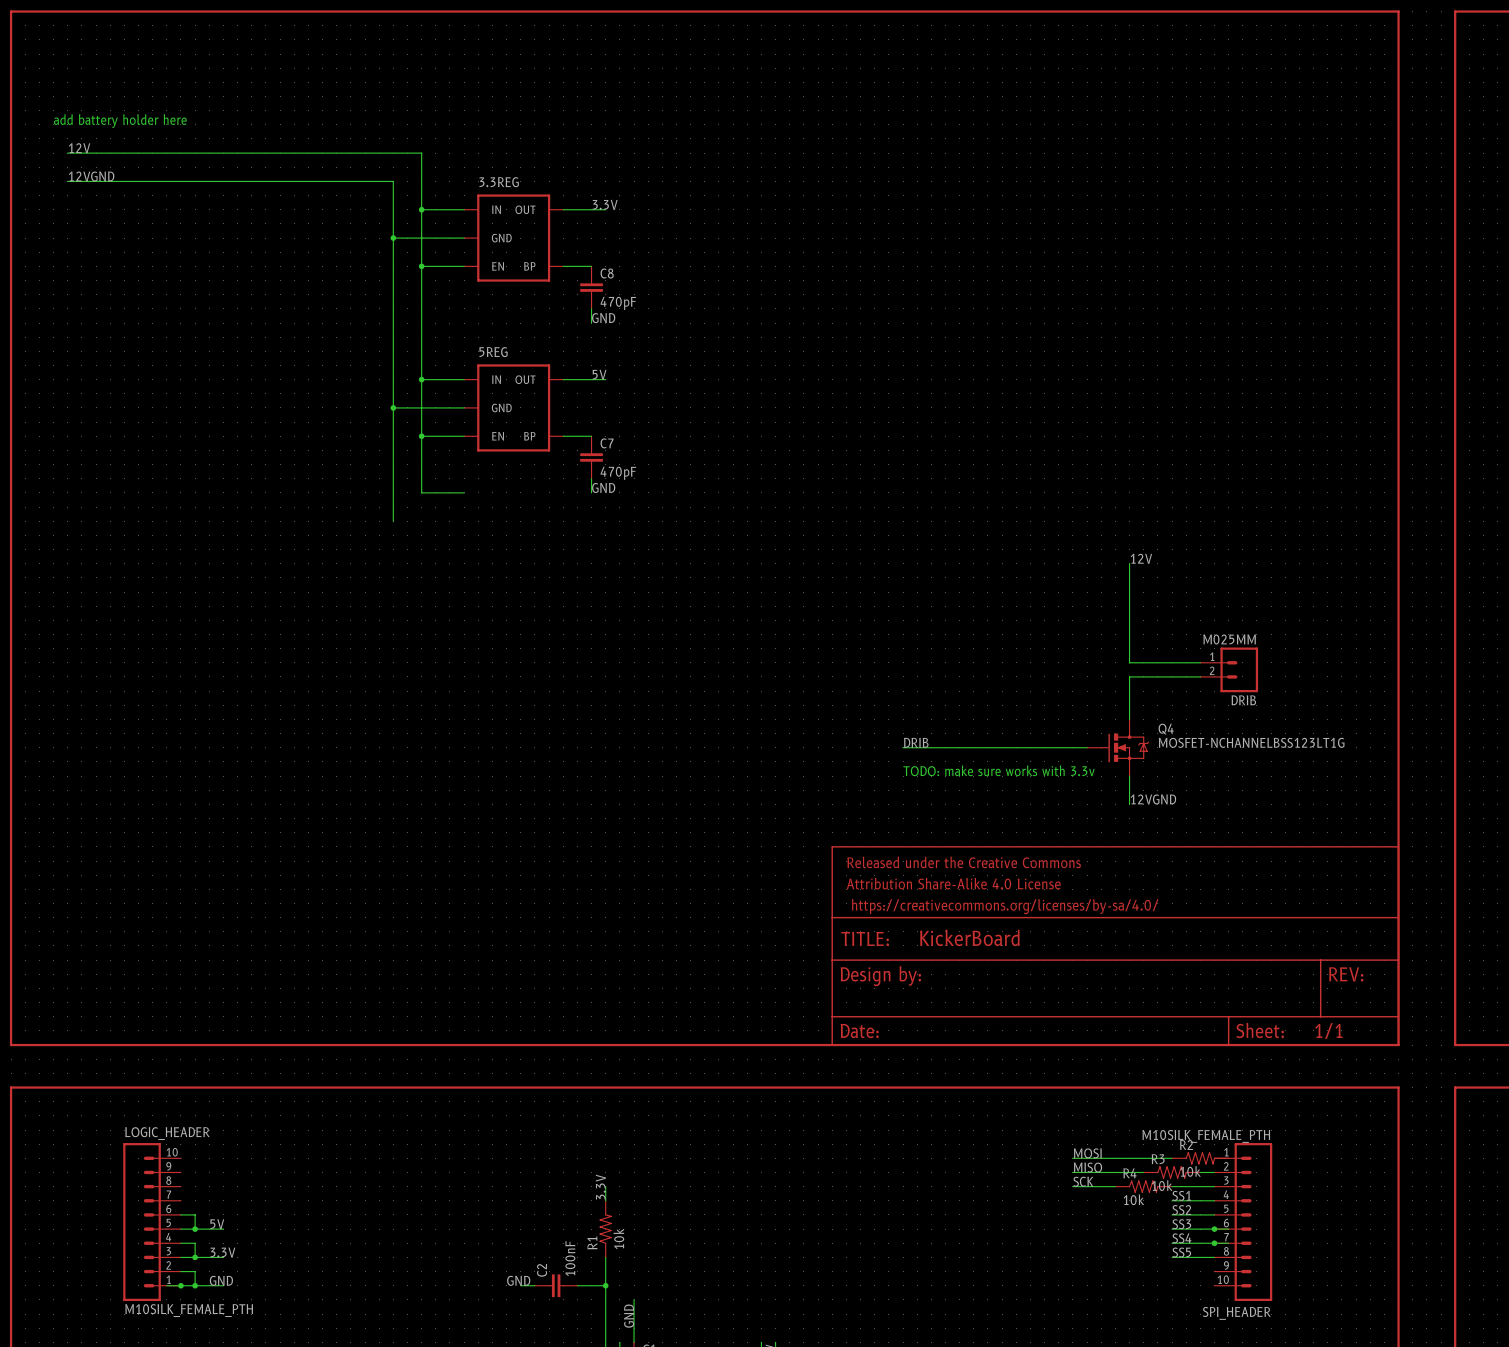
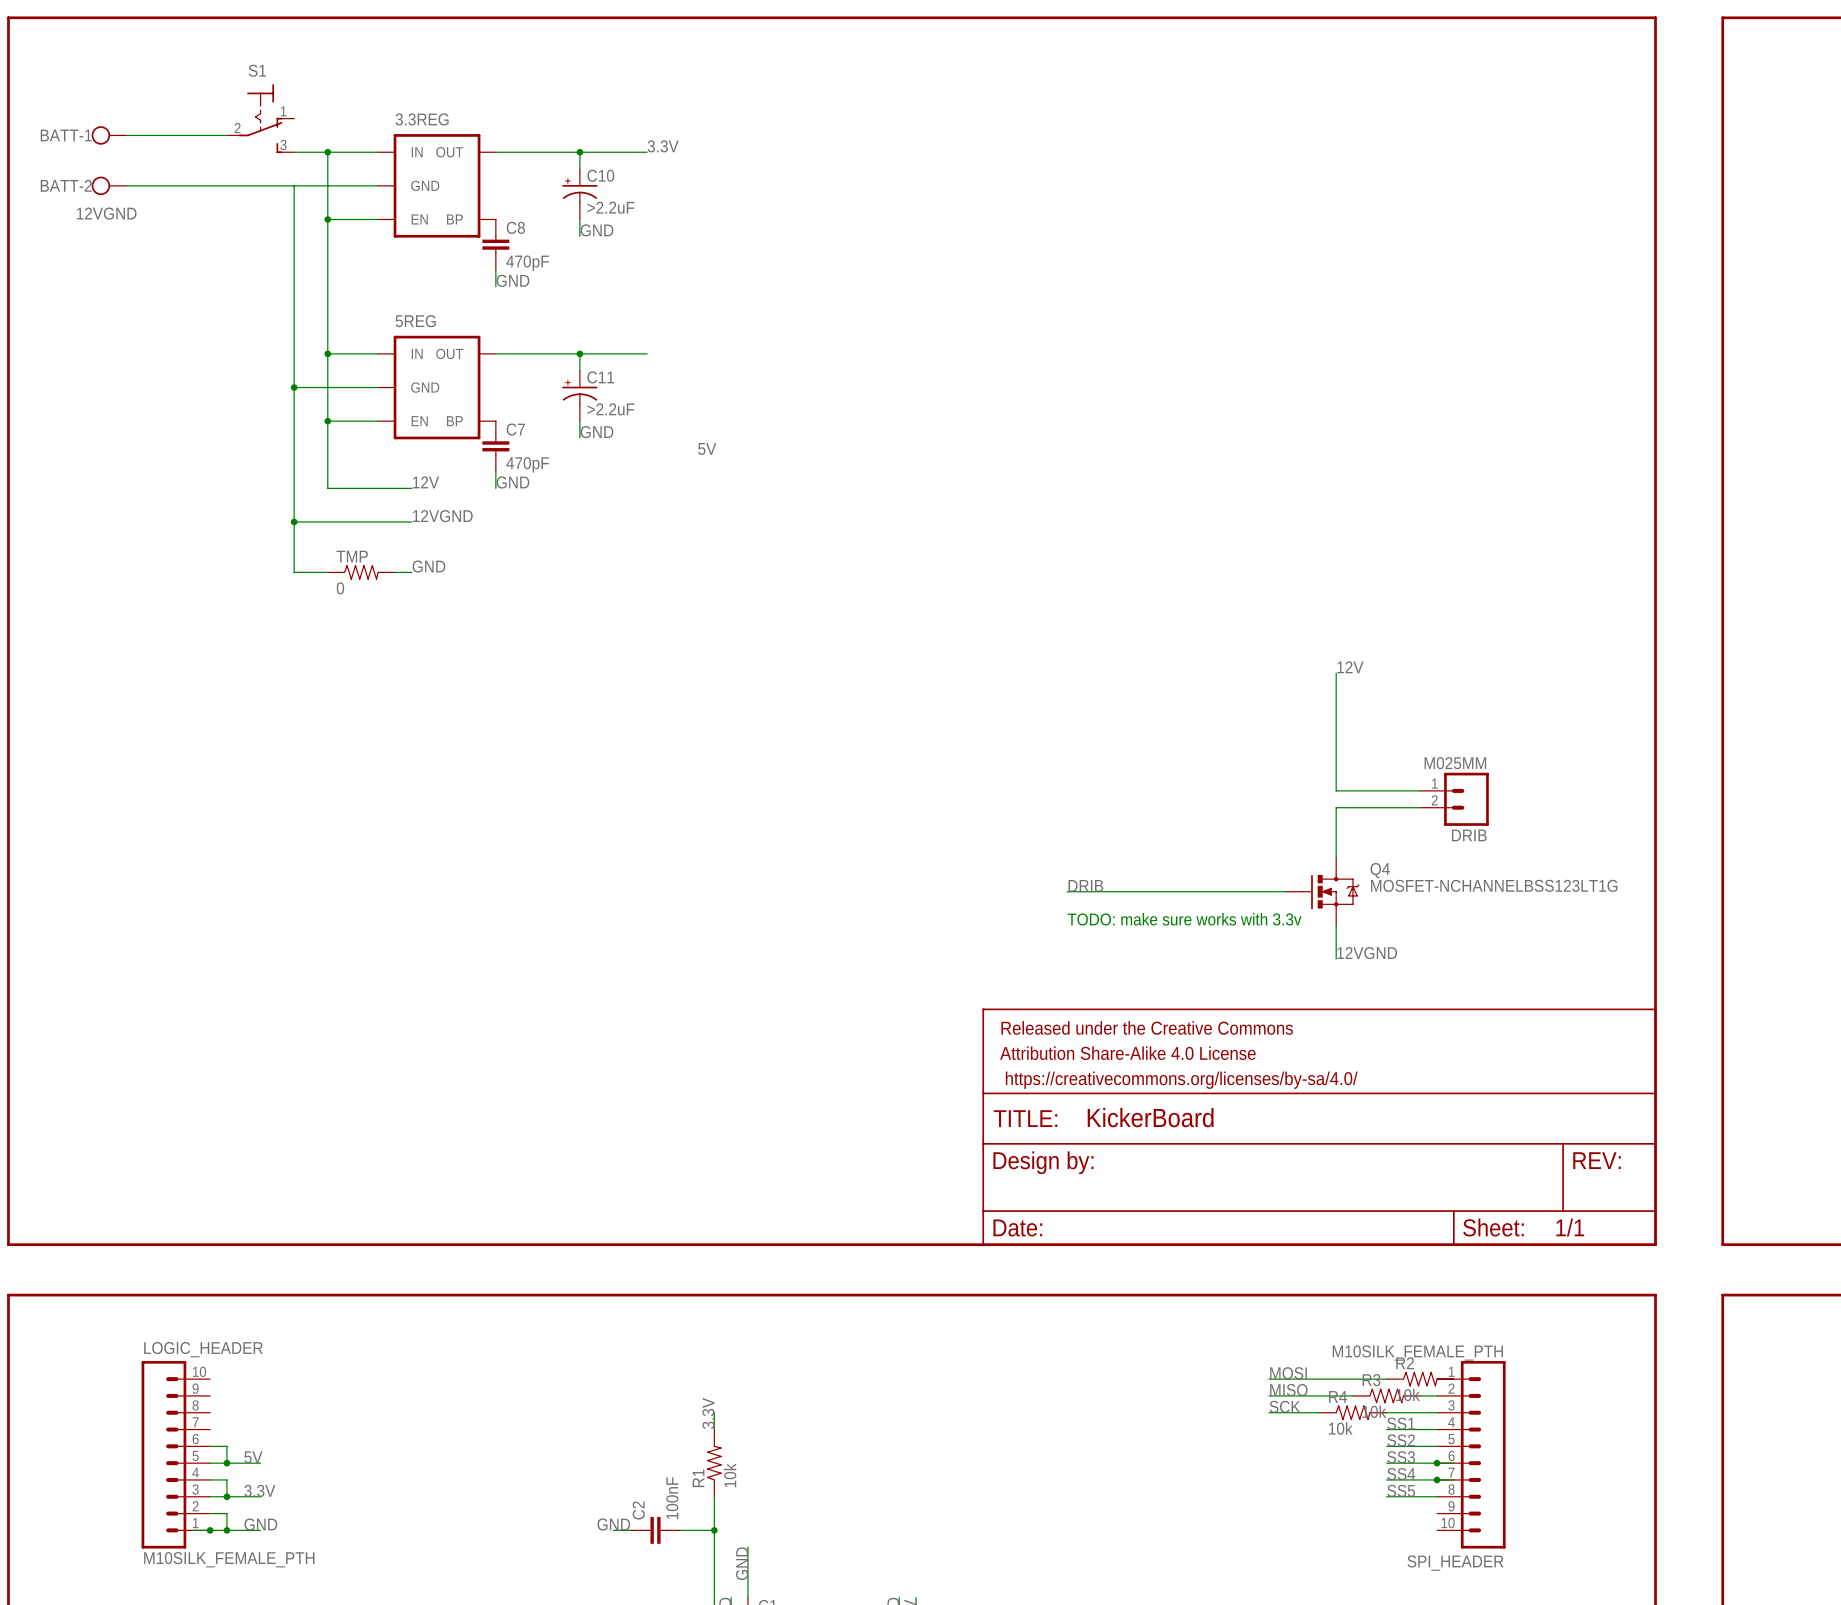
S1: none -> (260, 118)
BATT-1: none -> (108, 135)
wire: none -> (126, 135) (226, 135)
text: add battery holder here (120, 121) -> none
wire: none -> (294, 152) (378, 152)
wire: none -> (327, 152) (327, 488) (411, 488)
junction: none -> (327, 152)
wire: none -> (495, 152) (647, 152)
wire: none -> (579, 152) (579, 169)
junction: none -> (579, 152)
label: 12V (79, 148) -> none
wire: (67, 153) (110, 153) -> none
BATT-2: none -> (108, 185)
wire: none -> (294, 185) (294, 572) (327, 572)
wire: (322, 153) (421, 153) (421, 223) -> none
C10: none -> >2.2uF (579, 194)
wire: (67, 181) (280, 181) -> none
junction: none -> (327, 219)
wire: (322, 181) (393, 181) (393, 521) -> none
wire: none -> (579, 219) (579, 236)
label: none -> GND (597, 230)
label position: 3.3V (605, 204) -> 3.3V (663, 146)
wire: (421, 209) (464, 209) -> none
junction: (421, 209) -> none
wire: (563, 209) (605, 209) -> none
label: none -> GND (512, 280)
wire: (393, 238) (464, 238) -> none
junction: (393, 238) -> none
wire: (421, 238) (421, 393) -> none
3.3REG position: (513, 238) -> (437, 185)
wire: (421, 266) (464, 266) -> none
junction: (421, 266) -> none
wire: (563, 266) (591, 266) -> none
C8 position: (591, 287) -> (495, 244)
wire: none -> (327, 353) (378, 353)
junction: none -> (327, 353)
wire: none -> (495, 353) (647, 353)
junction: none -> (579, 353)
wire: (591, 308) (591, 323) -> (579, 353) (579, 370)
label: GND (603, 318) -> none
wire: none -> (294, 387) (378, 387)
junction: none -> (294, 387)
C11: none -> >2.2uF (579, 395)
wire: none -> (327, 421) (378, 421)
junction: none -> (327, 421)
wire: none -> (579, 421) (579, 437)
label: none -> GND (597, 432)
wire: (421, 379) (464, 379) -> none
junction: (421, 379) -> none
wire: (563, 379) (605, 379) -> none
label: none -> 12V (426, 482)
label: none -> GND (512, 482)
wire: (393, 407) (464, 407) -> none
junction: (393, 407) -> none
wire: (421, 407) (421, 492) (464, 492) -> none
5REG position: (513, 407) -> (437, 387)
label: none -> 12VGND (442, 516)
wire: none -> (294, 521) (411, 521)
junction: none -> (294, 521)
wire: (421, 436) (464, 436) -> none
junction: (421, 436) -> none
wire: (563, 436) (591, 436) -> none
C7 position: (591, 457) -> (495, 446)
label: none -> GND (428, 566)
TMP: none -> 0 (361, 572)
wire: none -> (395, 572) (411, 572)
wire: (591, 478) (591, 492) -> none
label: GND (603, 488) -> none

